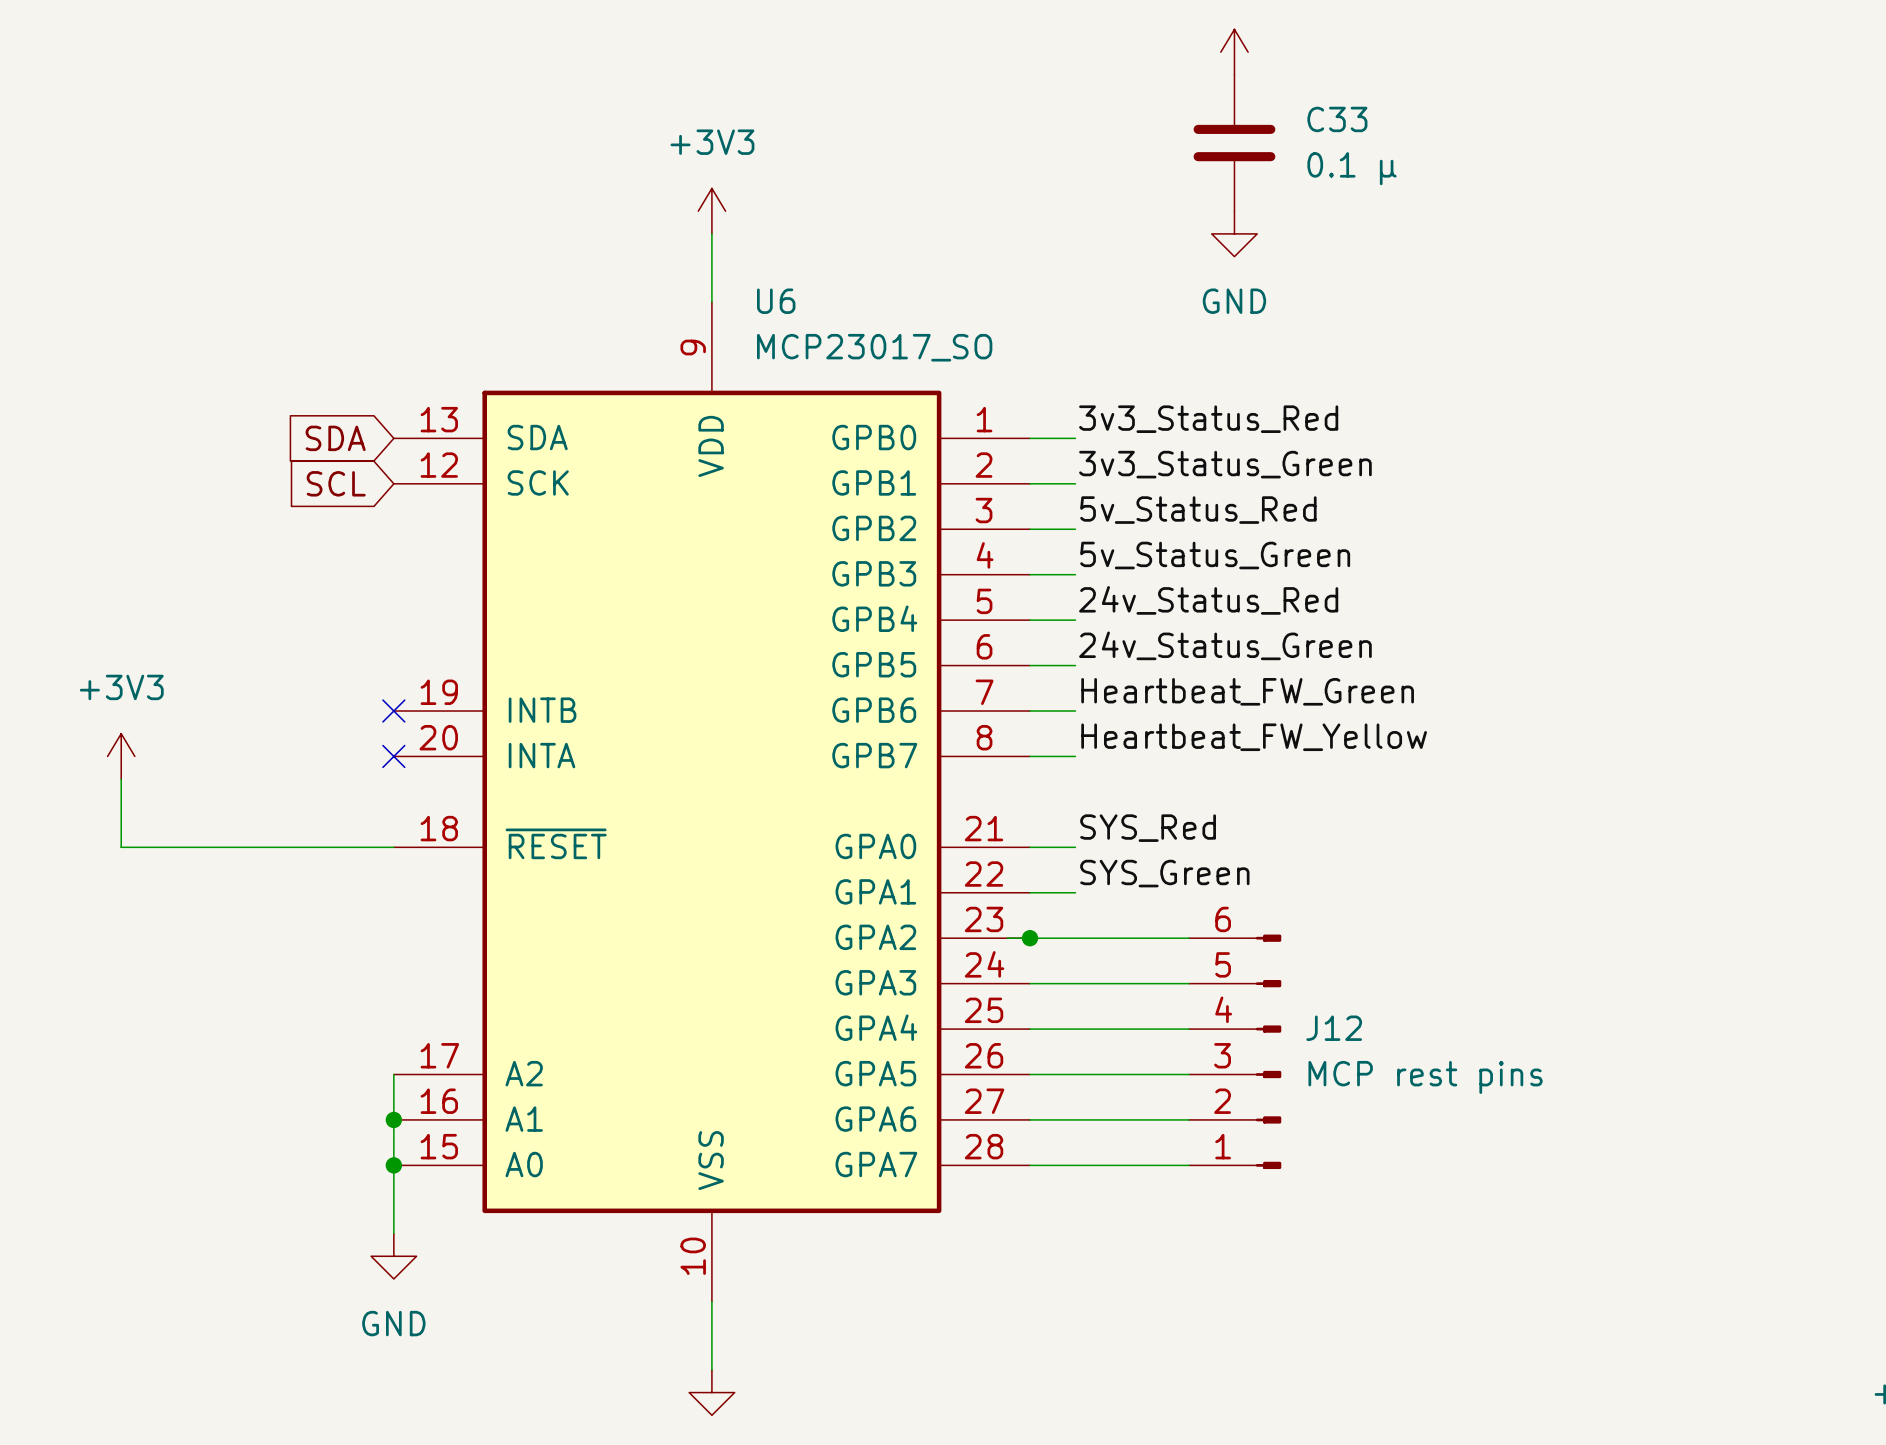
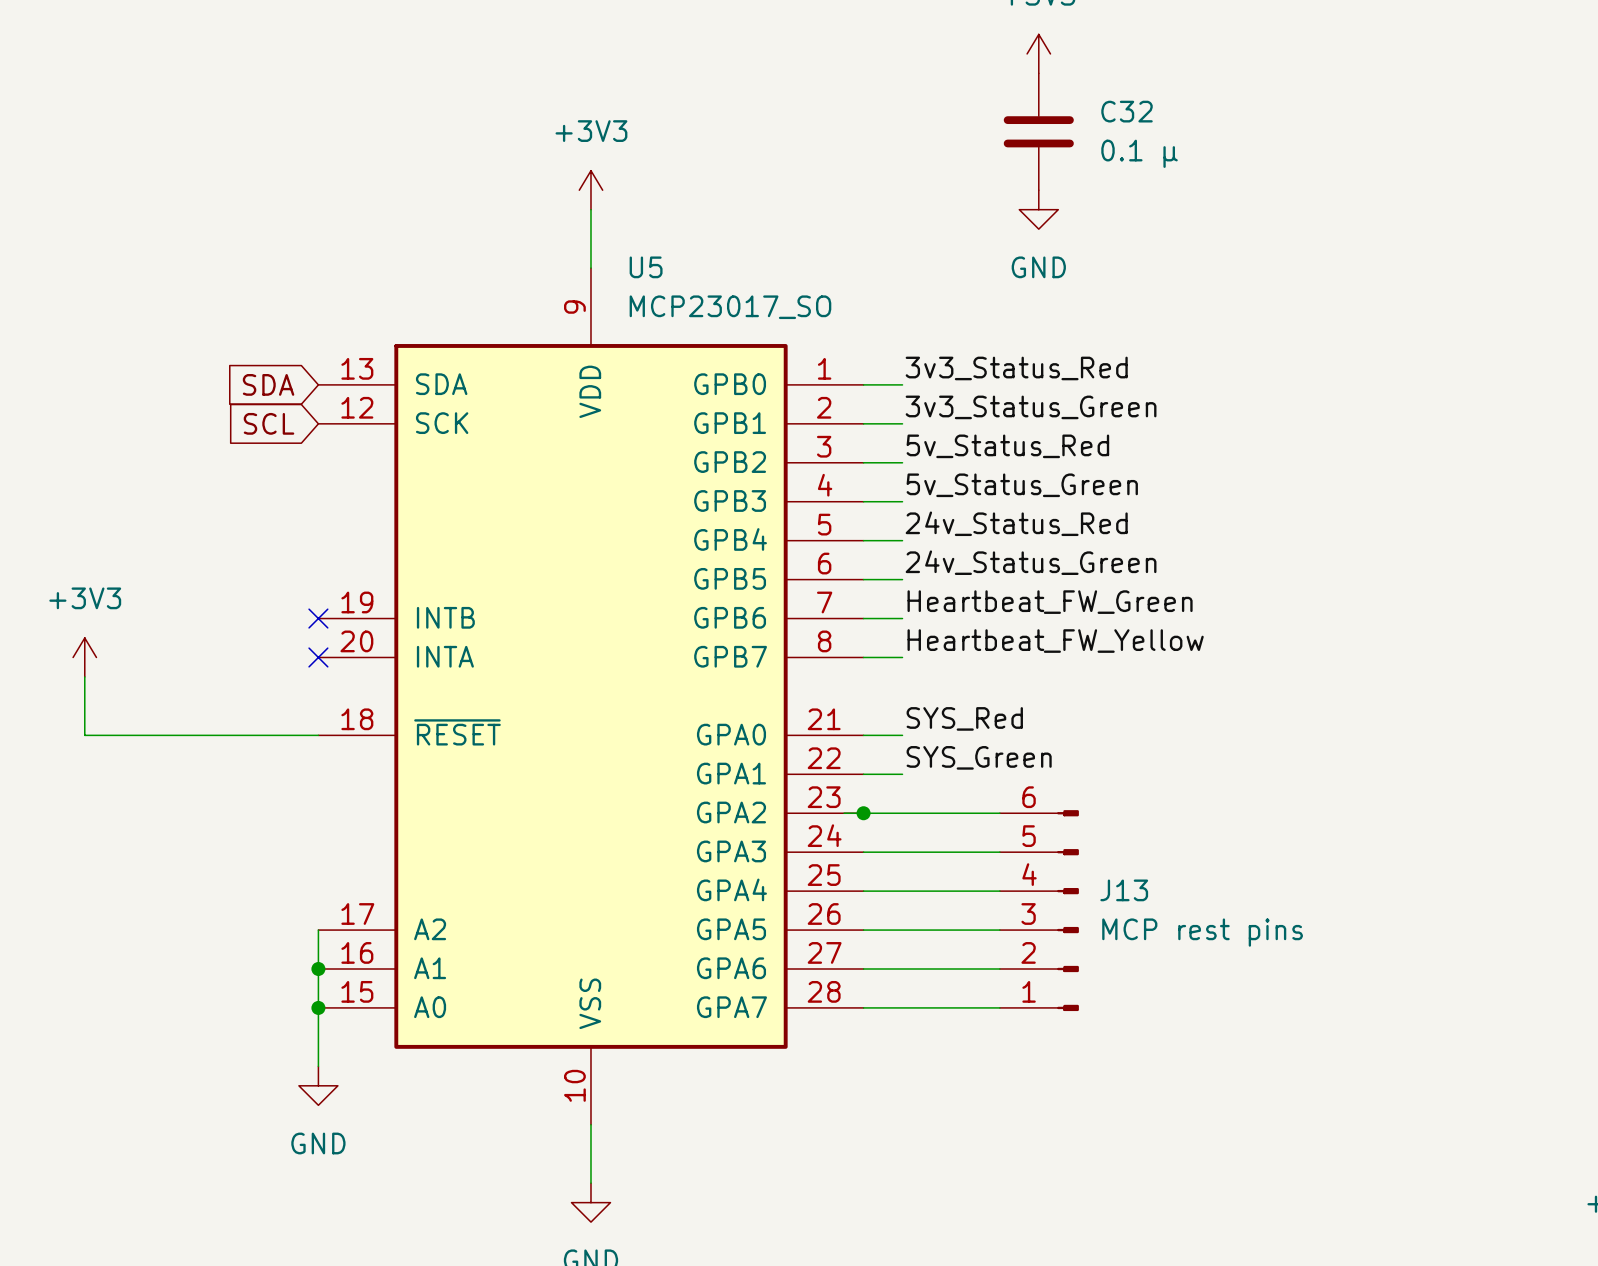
C33 name: C33 (1337, 119) -> C32 (1127, 111)
U6 name: U6 (776, 301) -> U5 (646, 267)
J12 name: J12 (1334, 1028) -> J13 (1124, 890)

